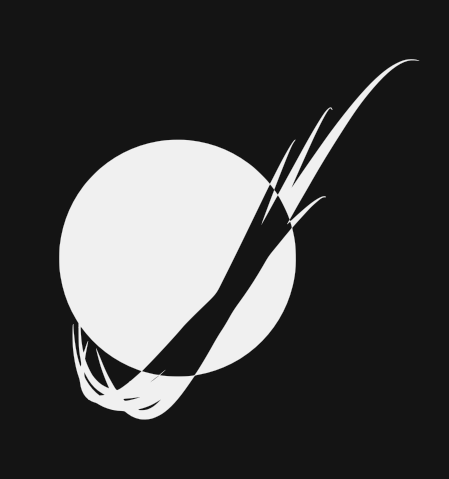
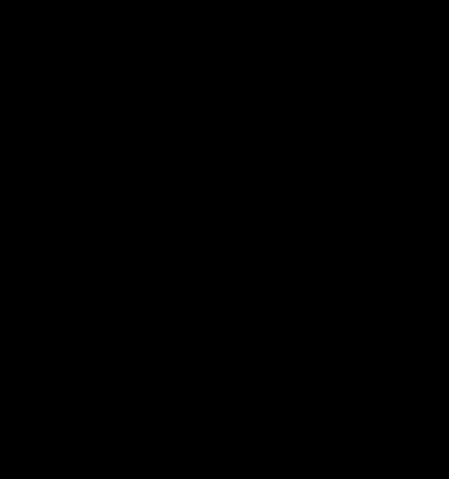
drawing: [59, 59, 420, 420] -> none

